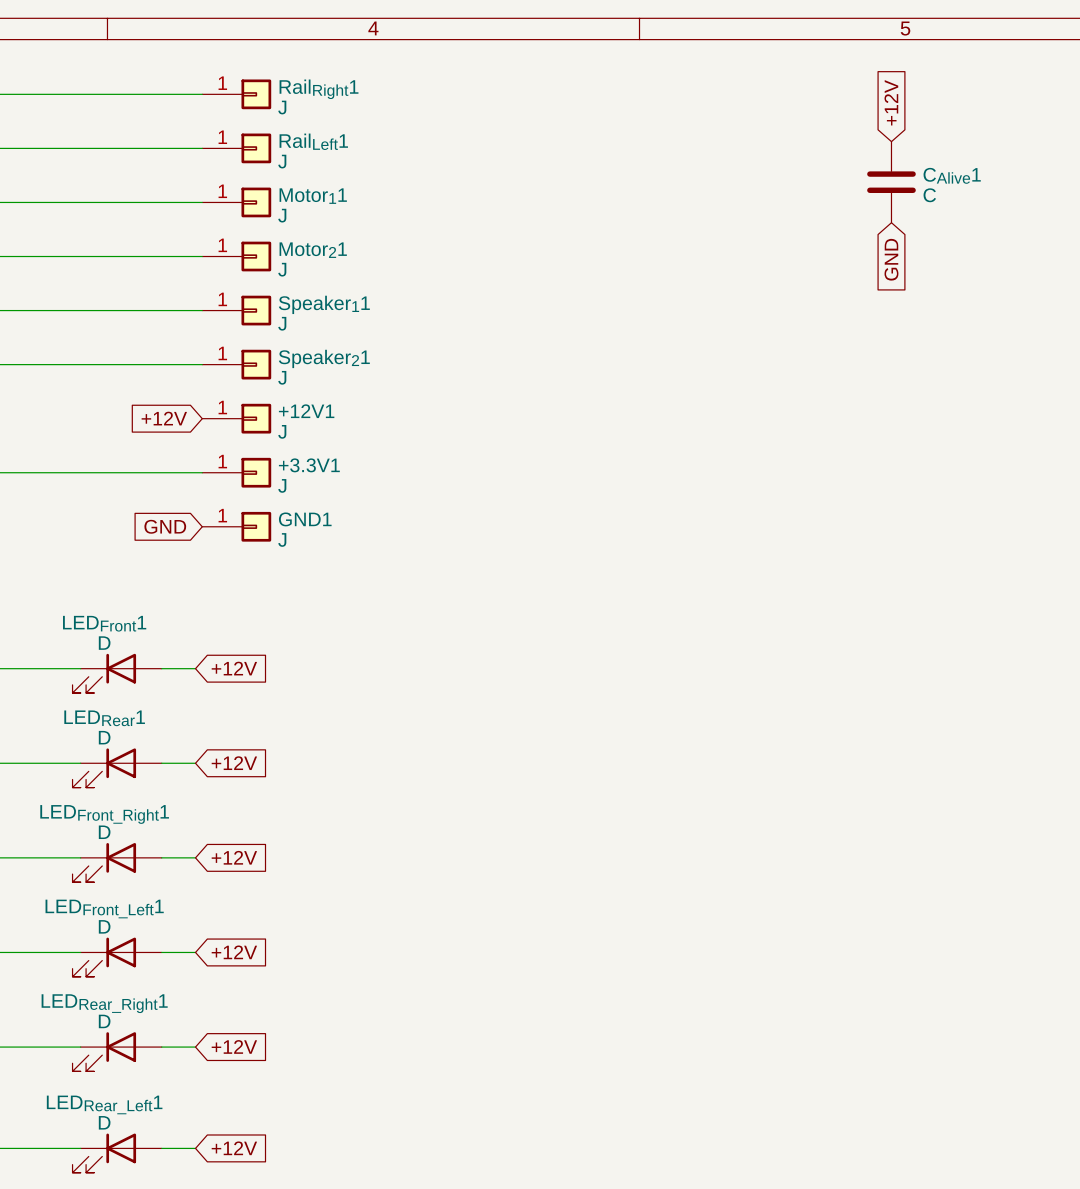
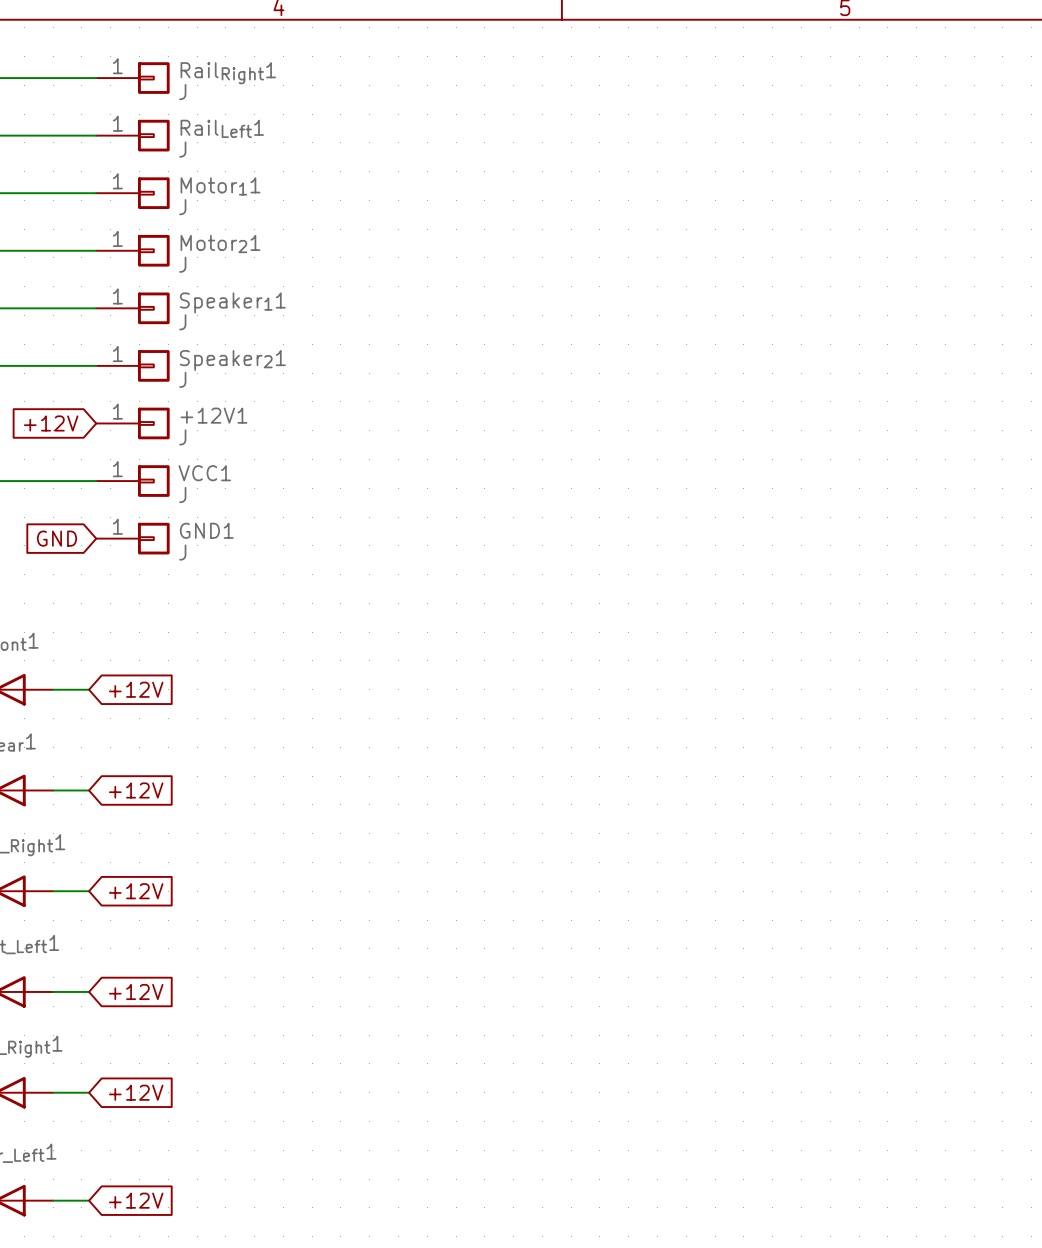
global label: +12V (891, 102) -> none
CAlive1: C (891, 182) -> none
global label: GND (891, 259) -> none
+3.3V1 name: +3.3V1 (309, 465) -> VCC1 (204, 473)

